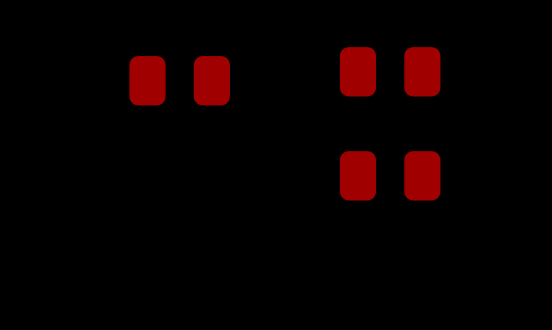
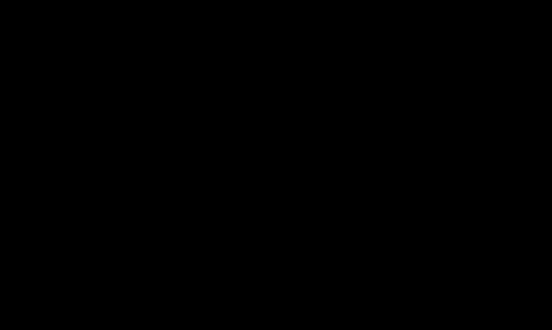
part: (390, 71) -> none
part: (179, 80) -> none
part: (390, 175) -> none

